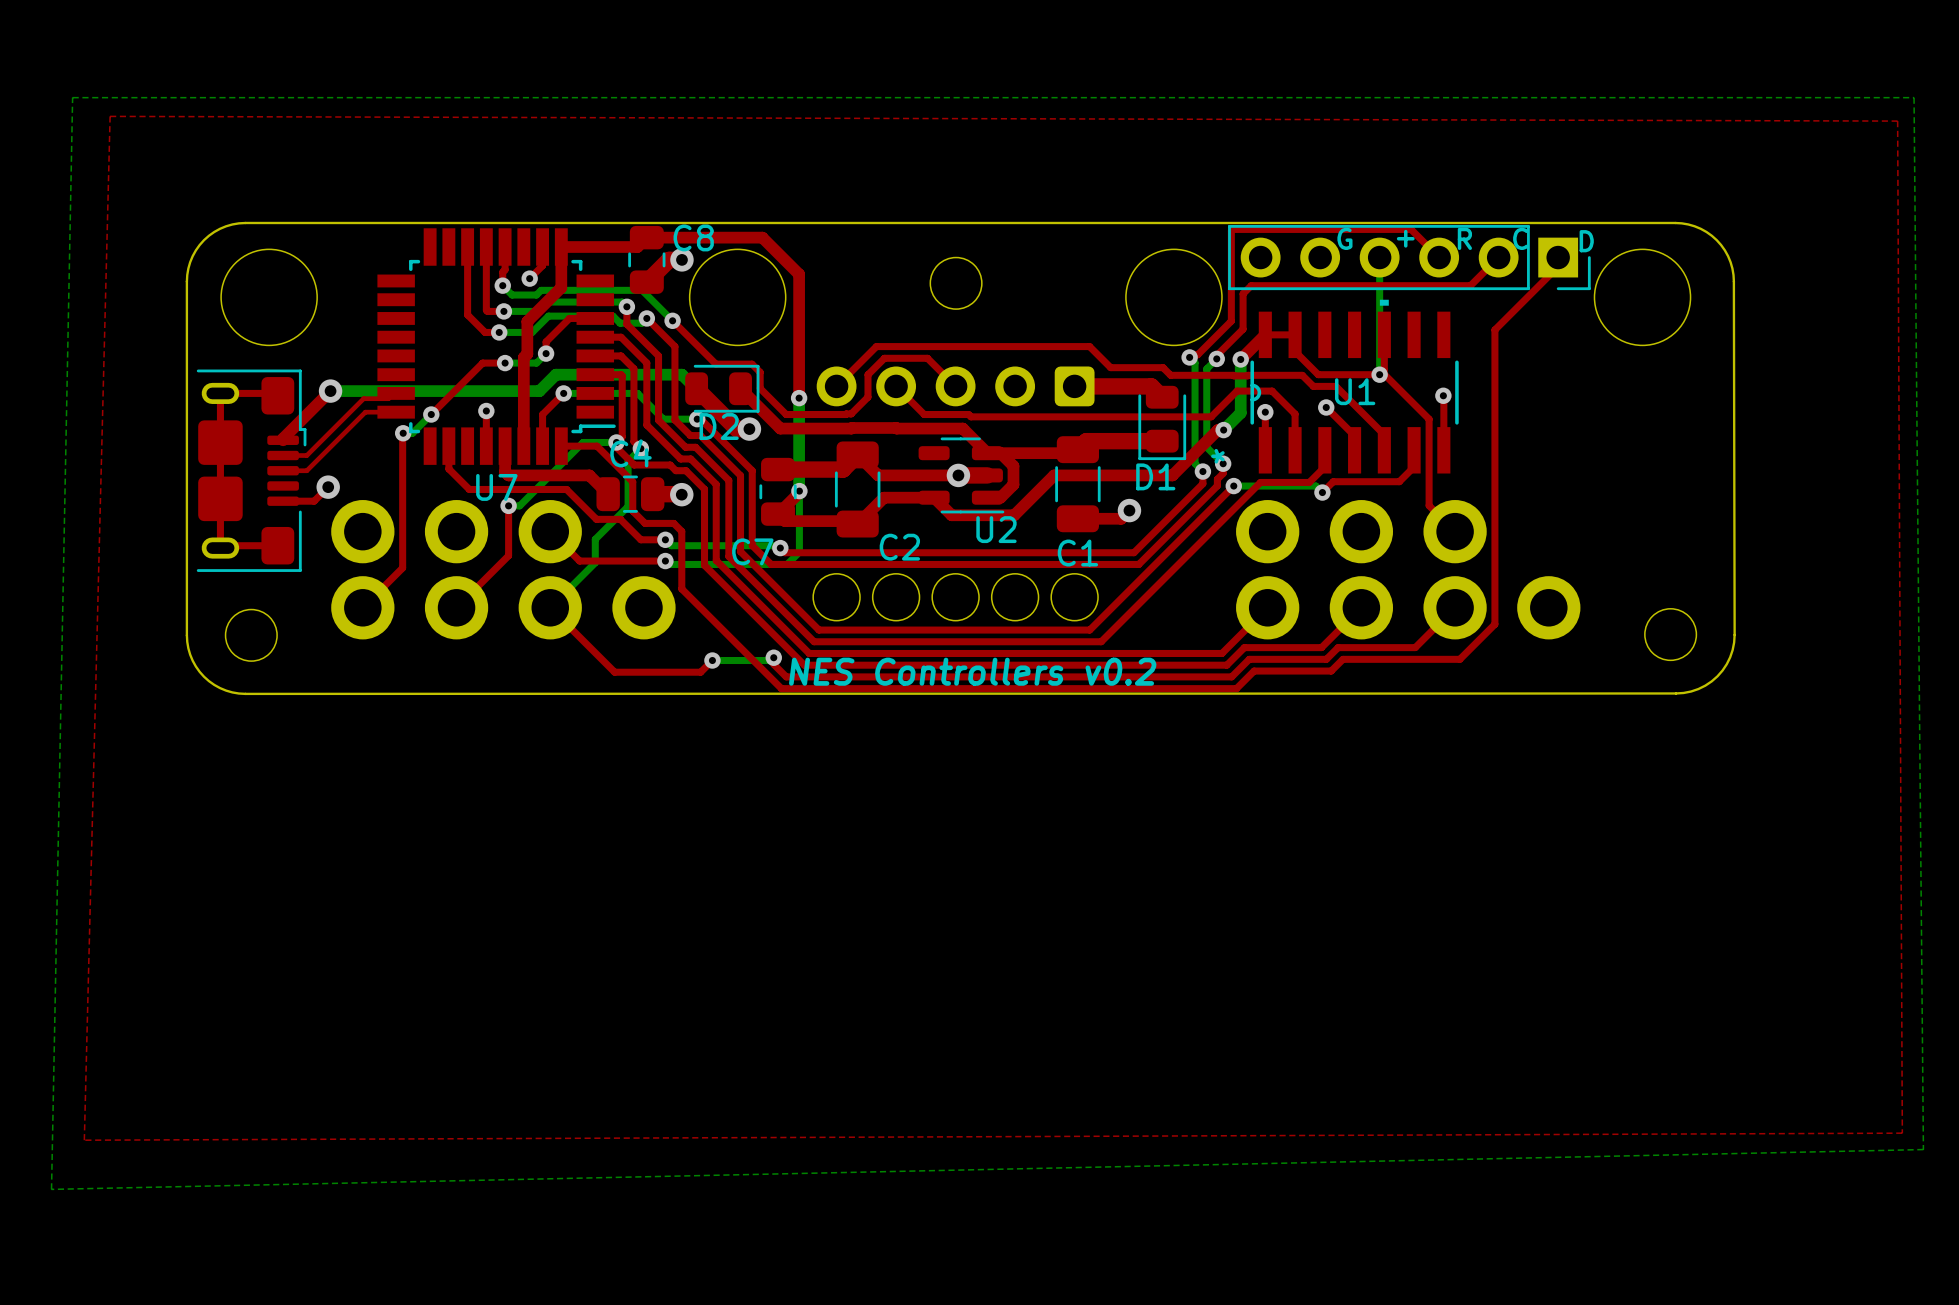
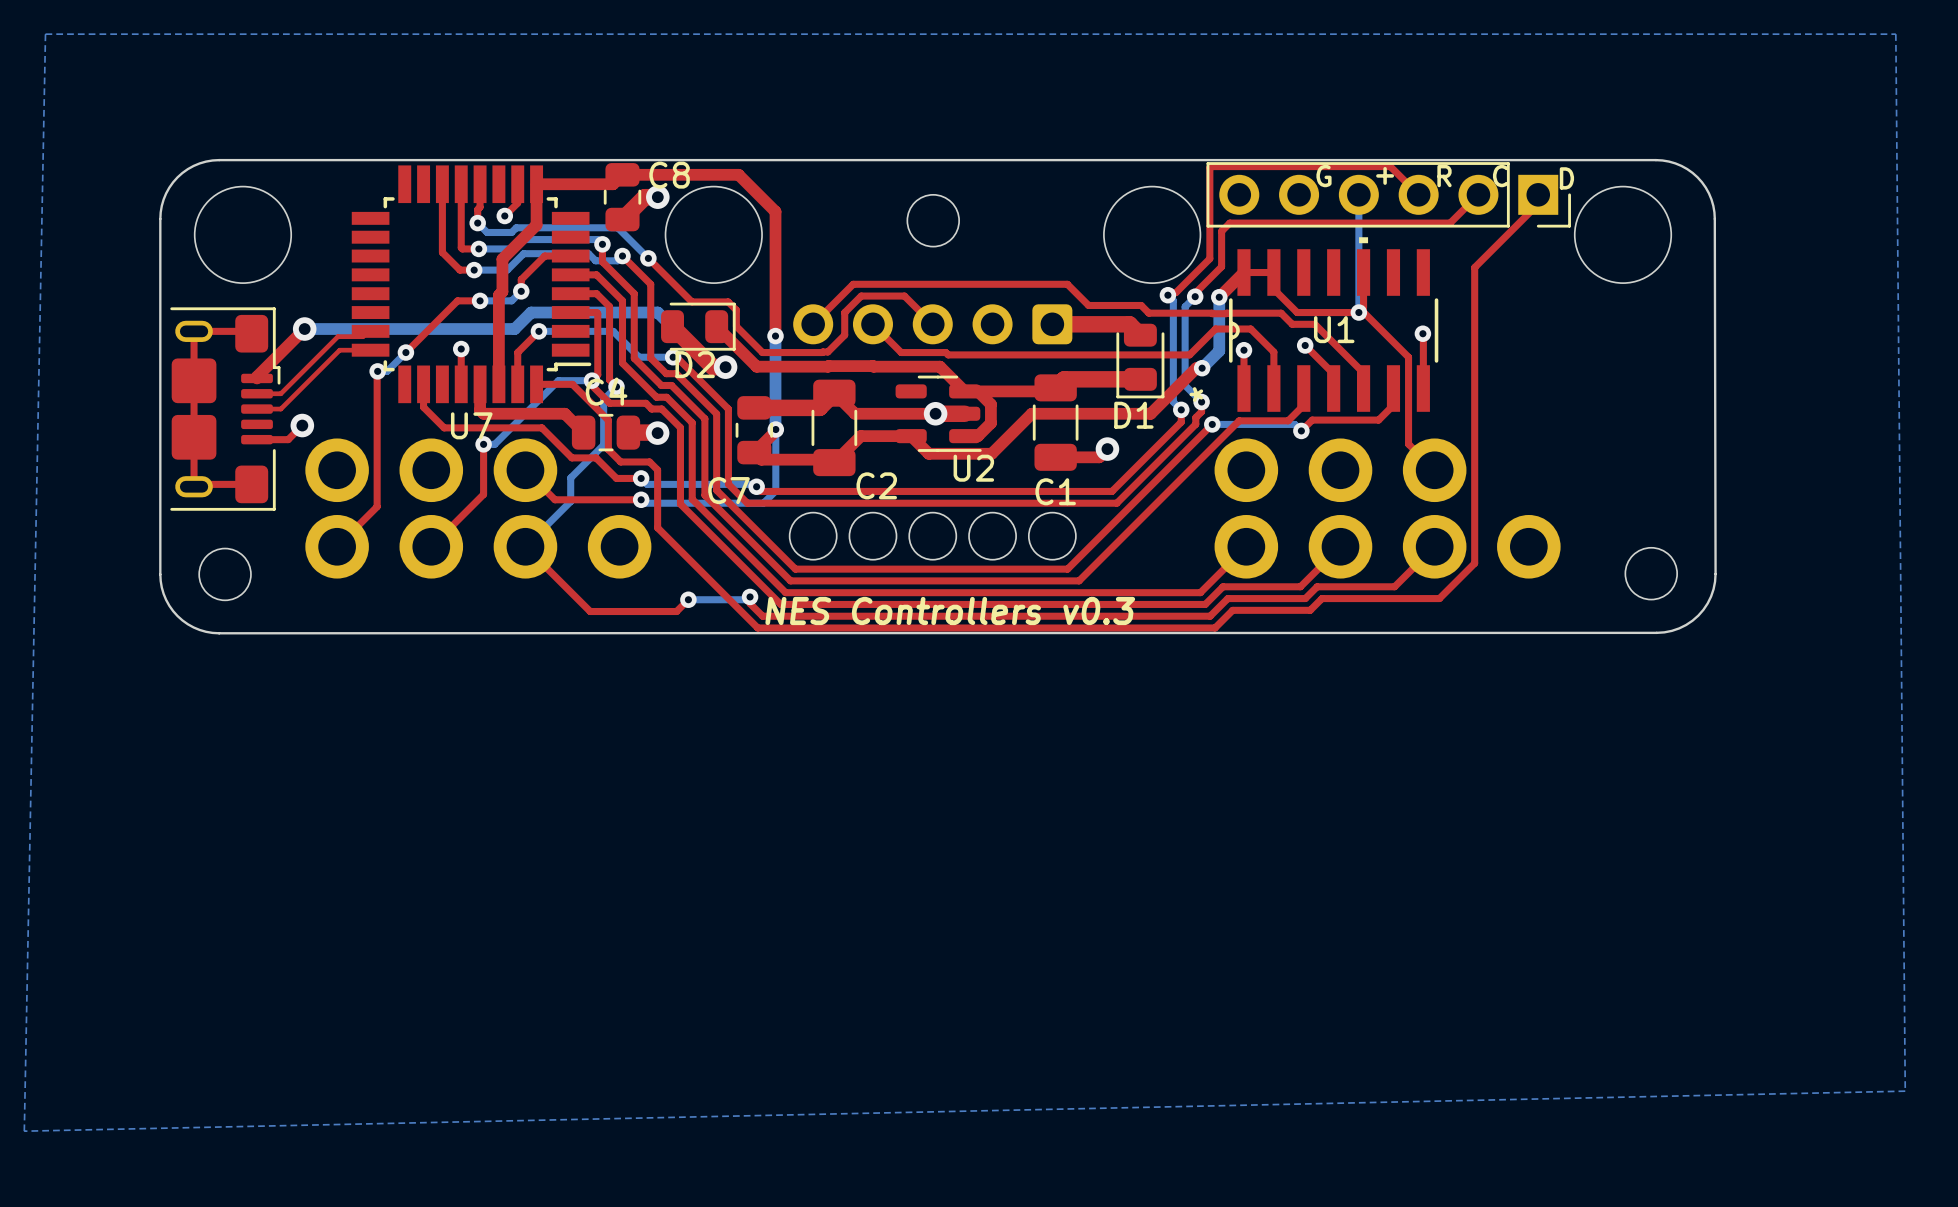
top zone outline: (110, 116) (1897, 121) (1902, 1133) (84, 1140) (110, 116) -> none
text: NES Controllers v0.2 (972, 671) -> NES Controllers v0.3 (950, 610)

